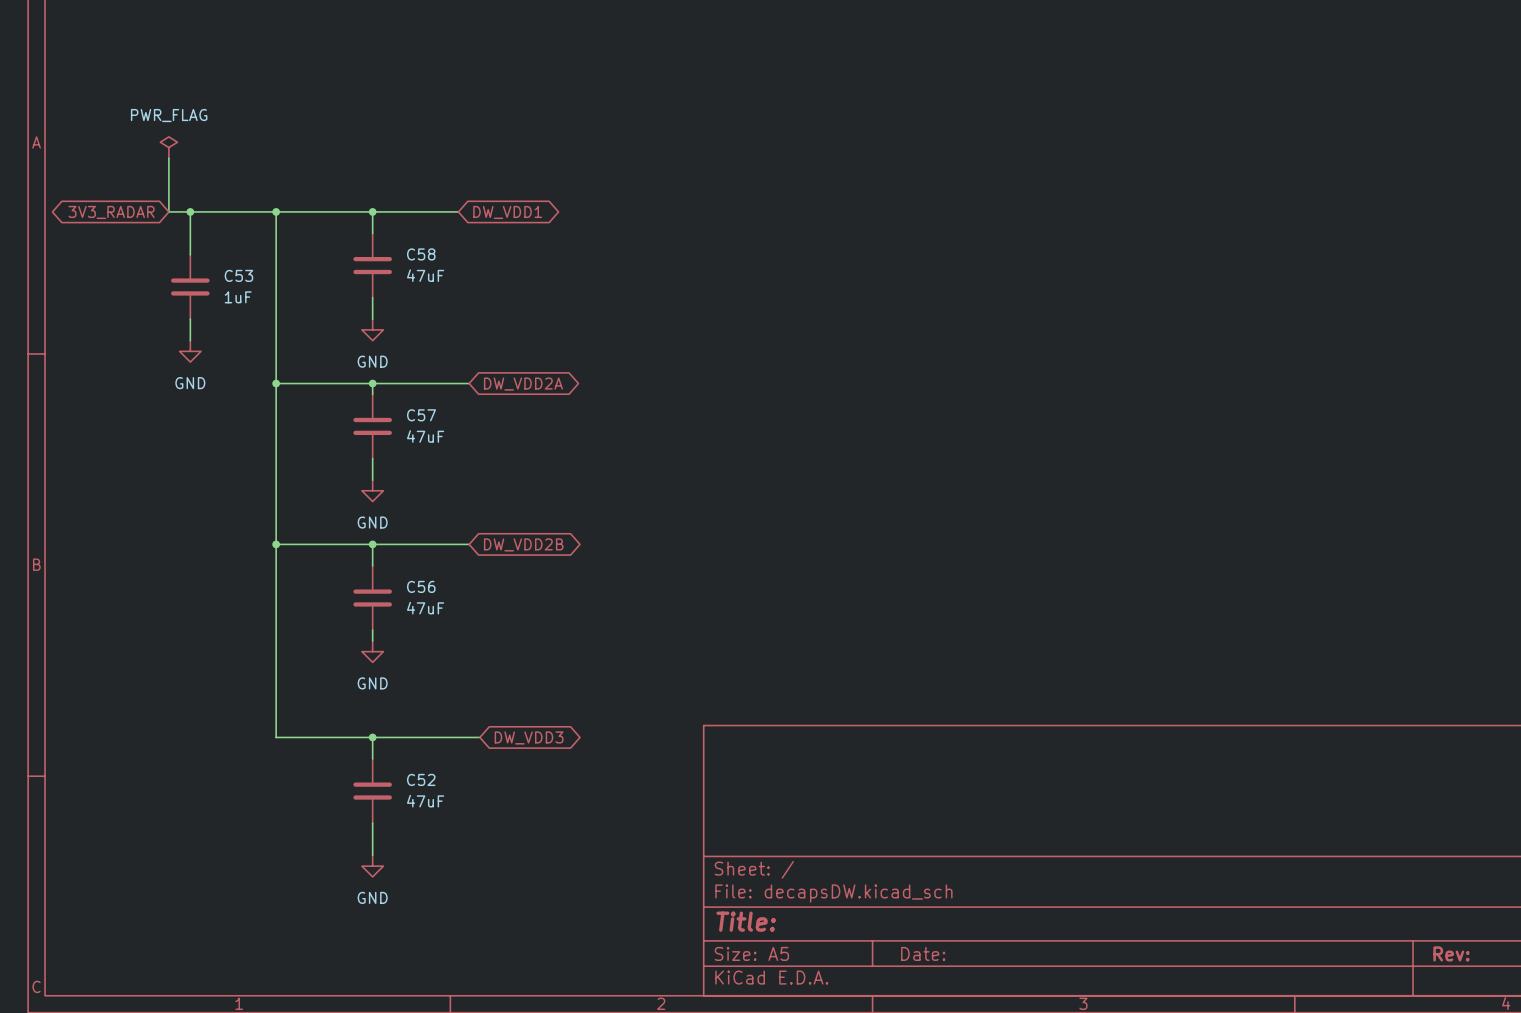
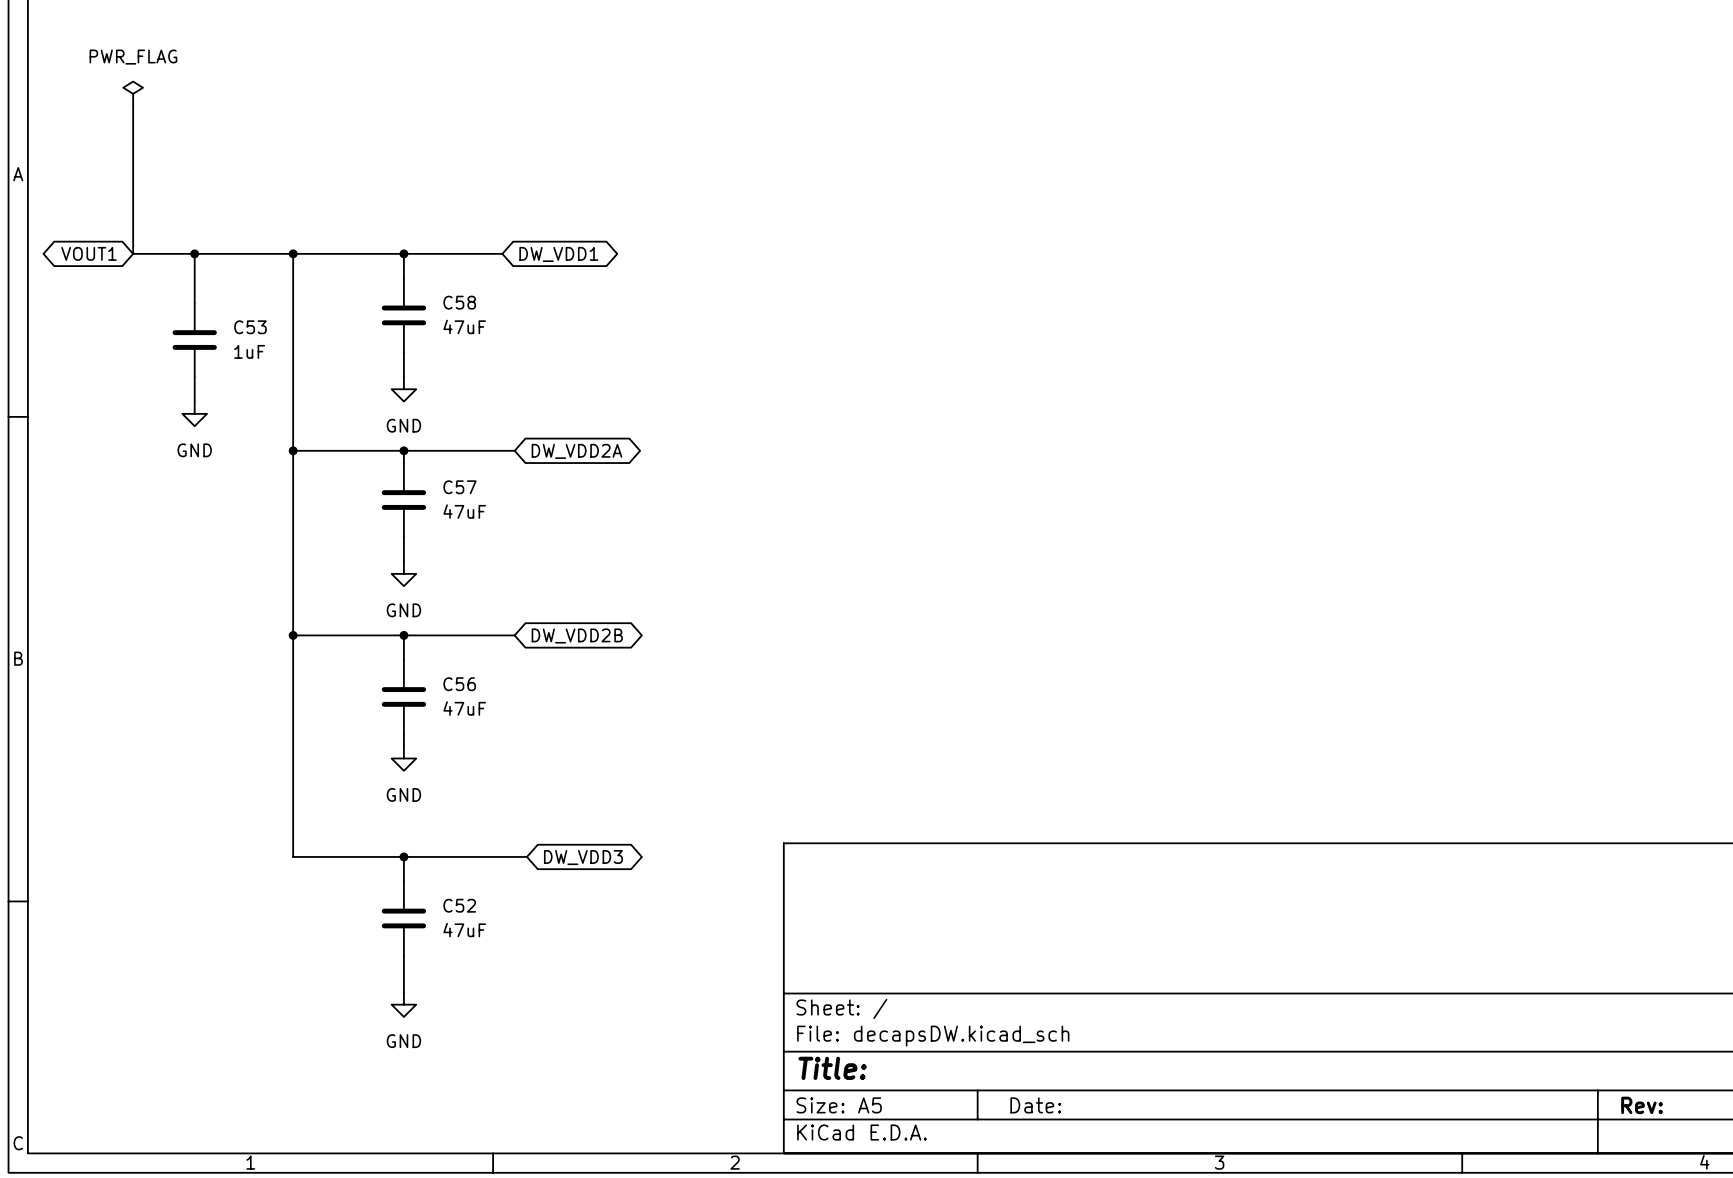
power symbol position: PWR_FLAG (168, 147) -> PWR_FLAG (133, 93)
wire: (168, 158) (168, 211) -> (133, 106) (133, 253) (170, 253)
global label: none -> VOUT1 (89, 253)
global label: 3V3_RADAR (111, 212) -> none

